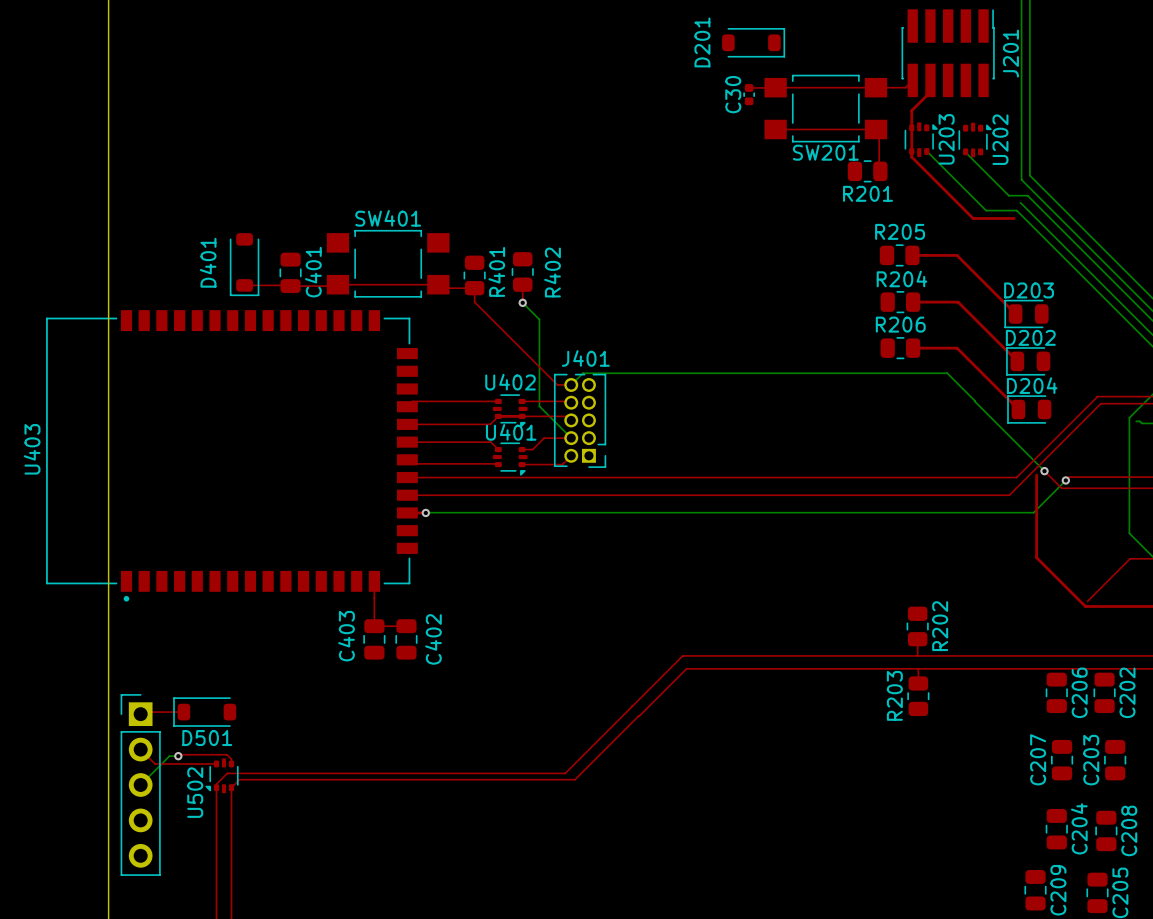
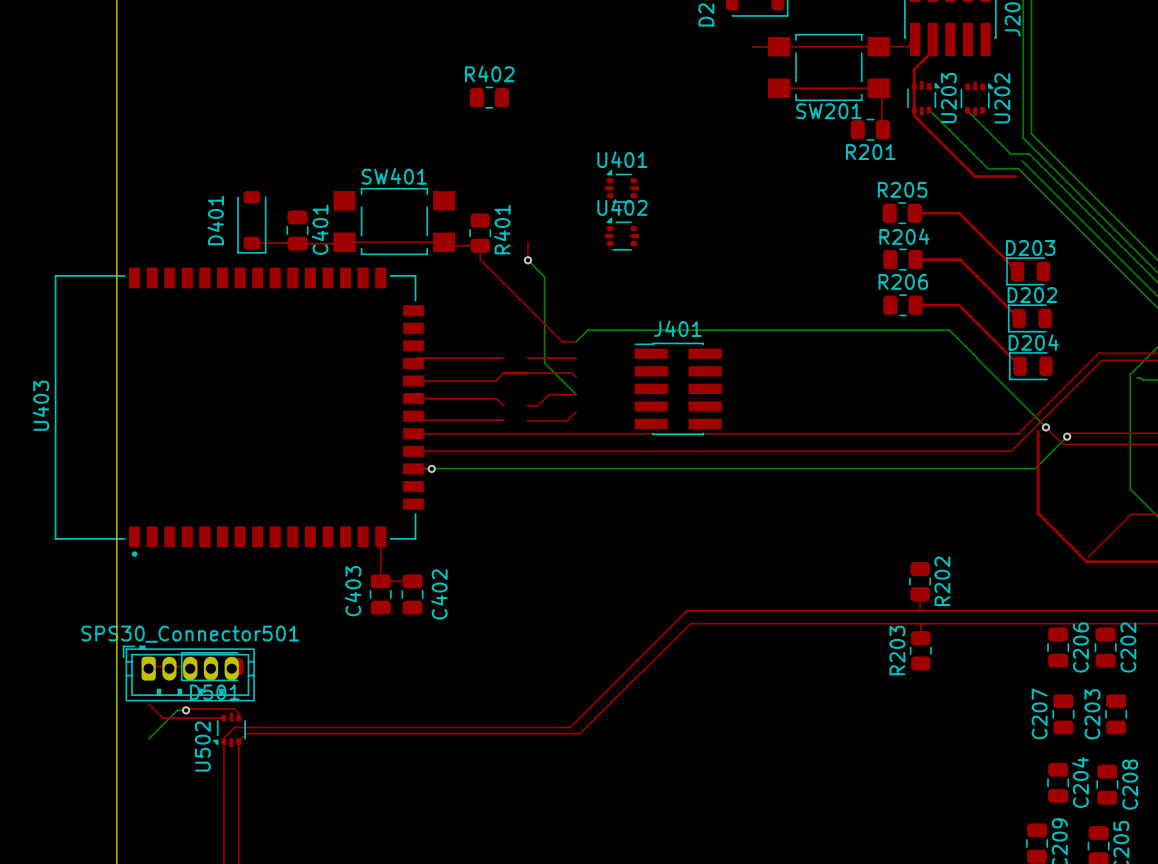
C30: (749, 94) -> none
R402 rotation: 0° (522, 271) -> 90° clockwise (489, 97)
R402 position: (522, 271) -> (489, 97)
R402 name position: R402 (552, 272) -> R402 (489, 73)
J401 footprint: [553, 373, 607, 468] -> [634, 342, 722, 436]
U402 rotation: 0° (510, 410) -> 180° (622, 234)
U402 position: (510, 410) -> (622, 234)
U401 rotation: 0° (510, 459) -> 180° (622, 186)
U401 position: (510, 459) -> (622, 186)
SPS30_Connector501: none -> (188, 673)
part: (140, 784) -> none

